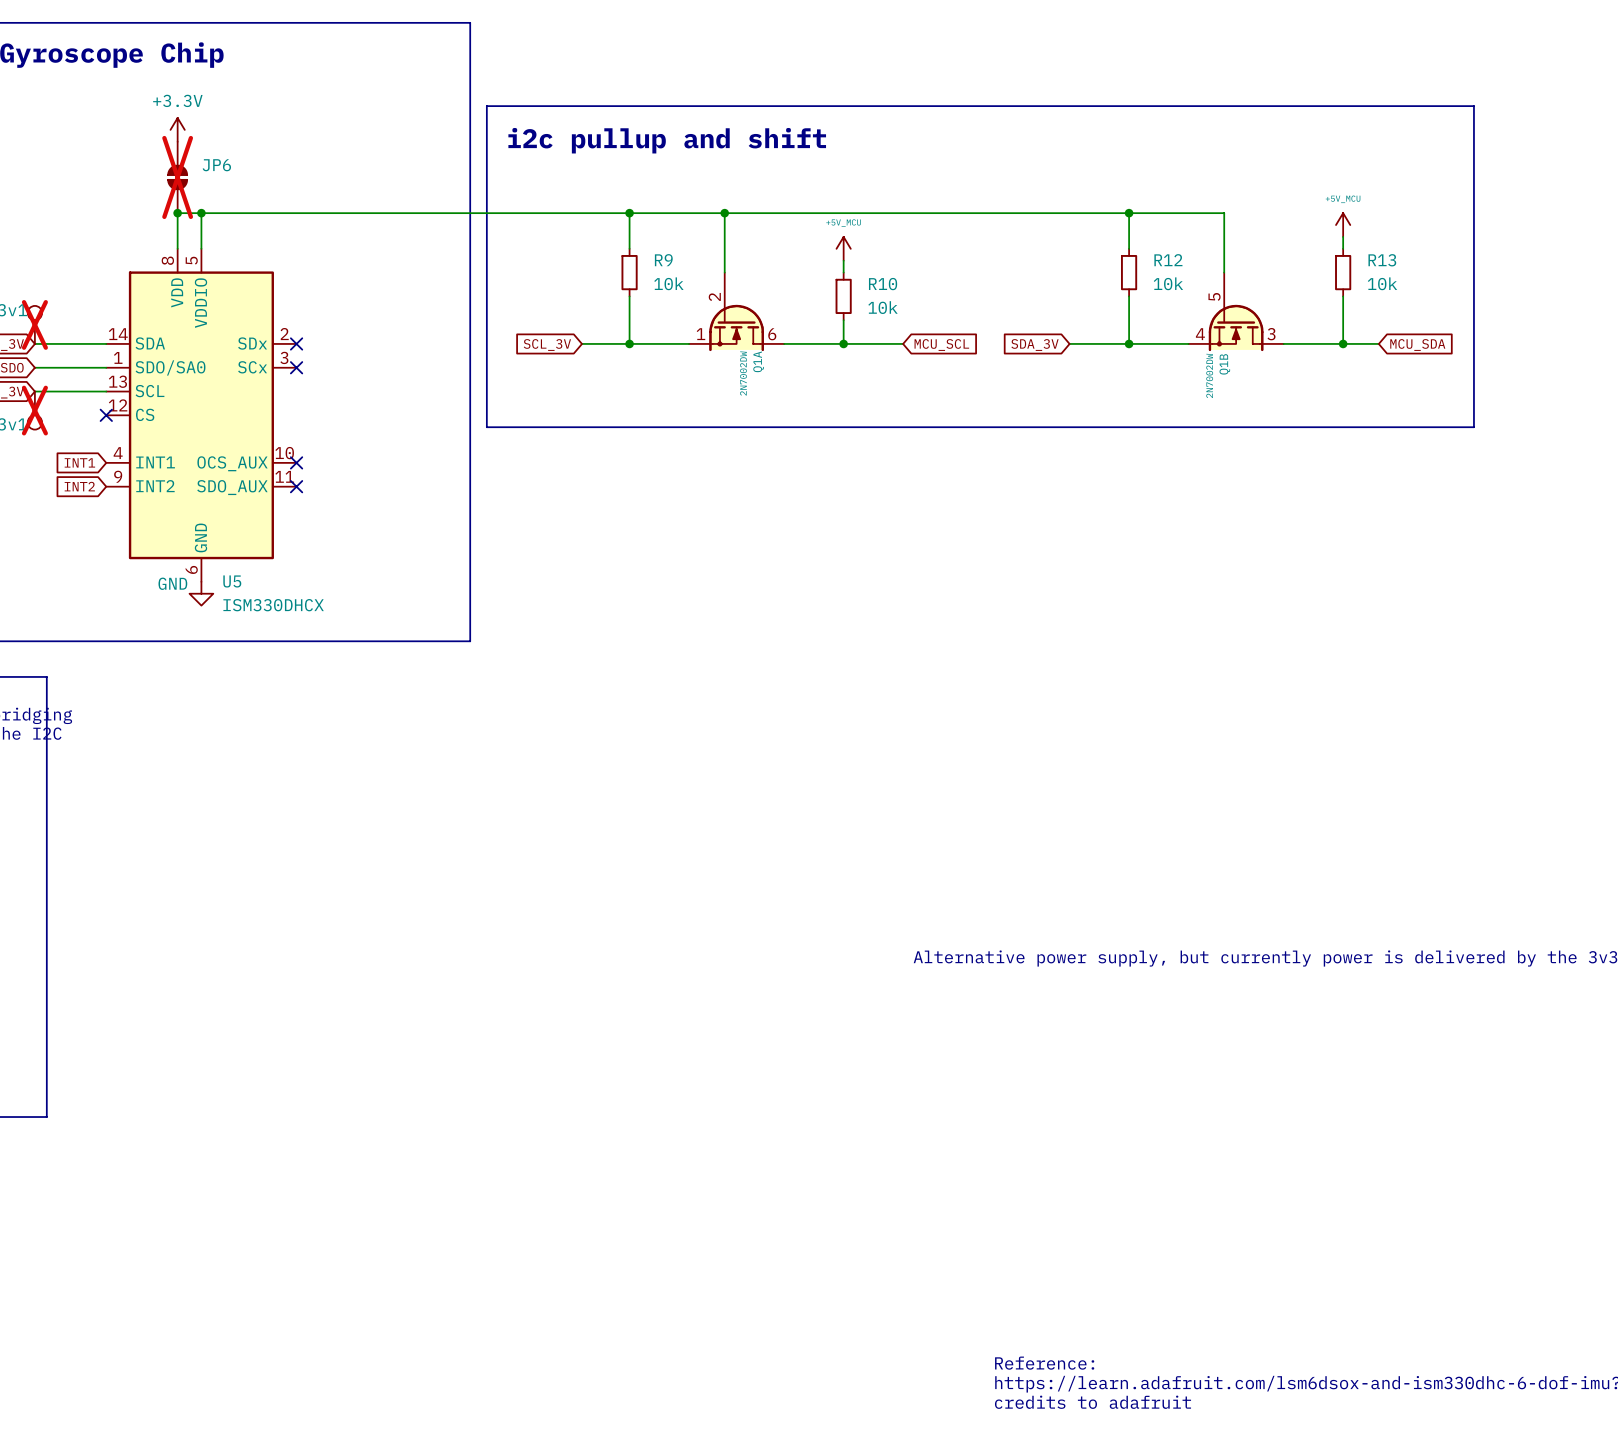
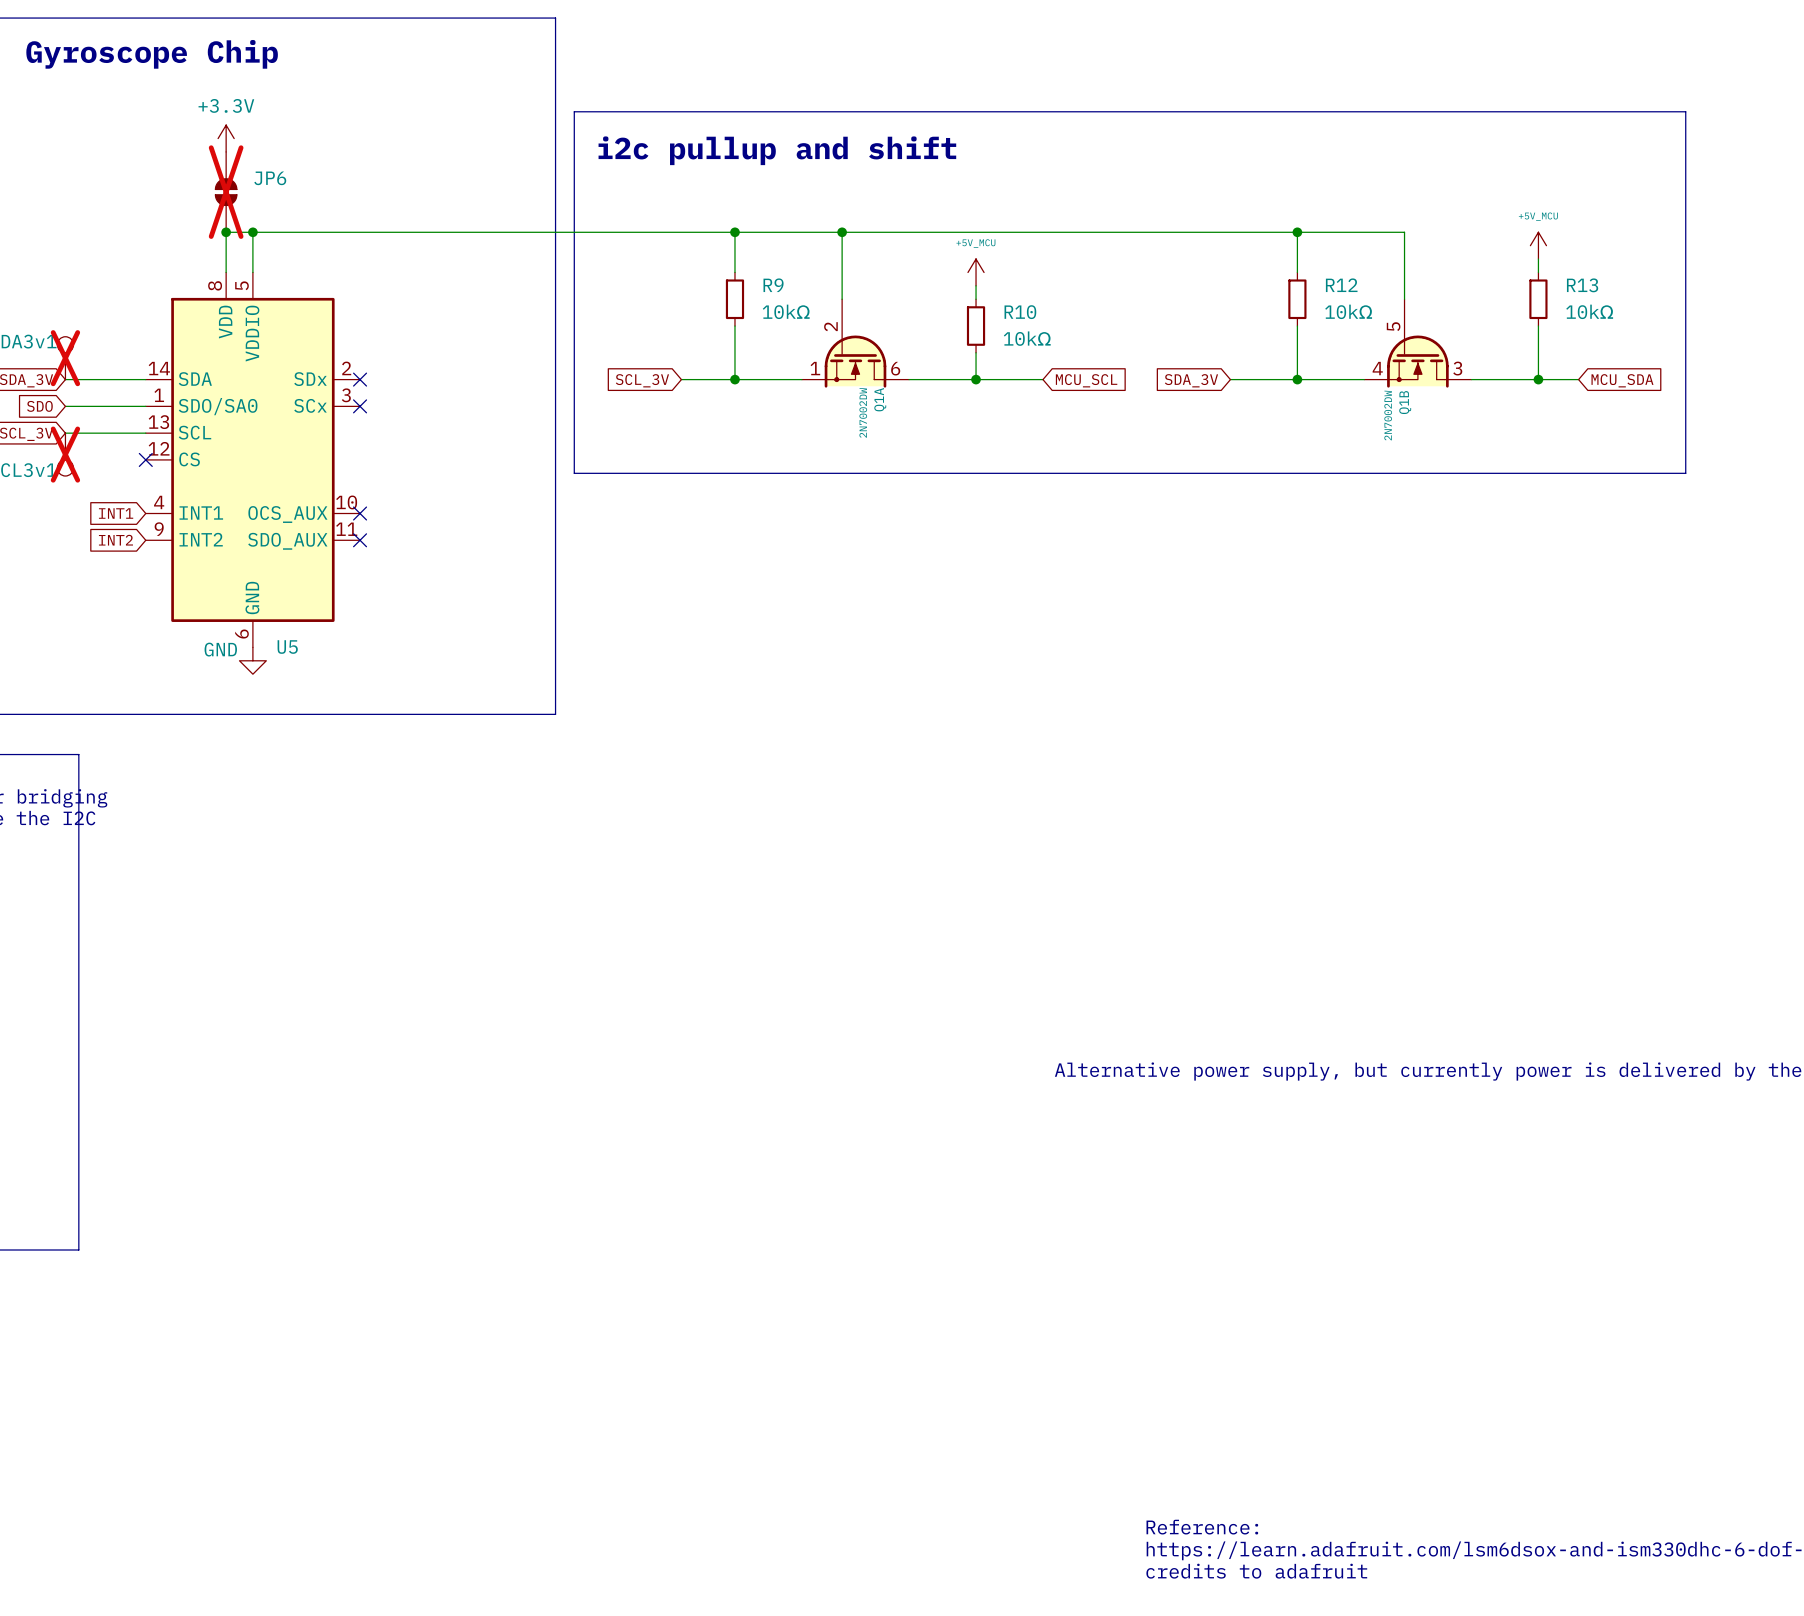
R9 value: 10k (668, 283) -> 10kΩ (786, 311)
R12 value: 10k (1168, 283) -> 10kΩ (1348, 311)
R13 value: 10k (1382, 283) -> 10kΩ (1589, 311)
R10 value: 10k (882, 307) -> 10kΩ (1027, 338)
U5 value: ISM330DHCX (273, 605) -> none

